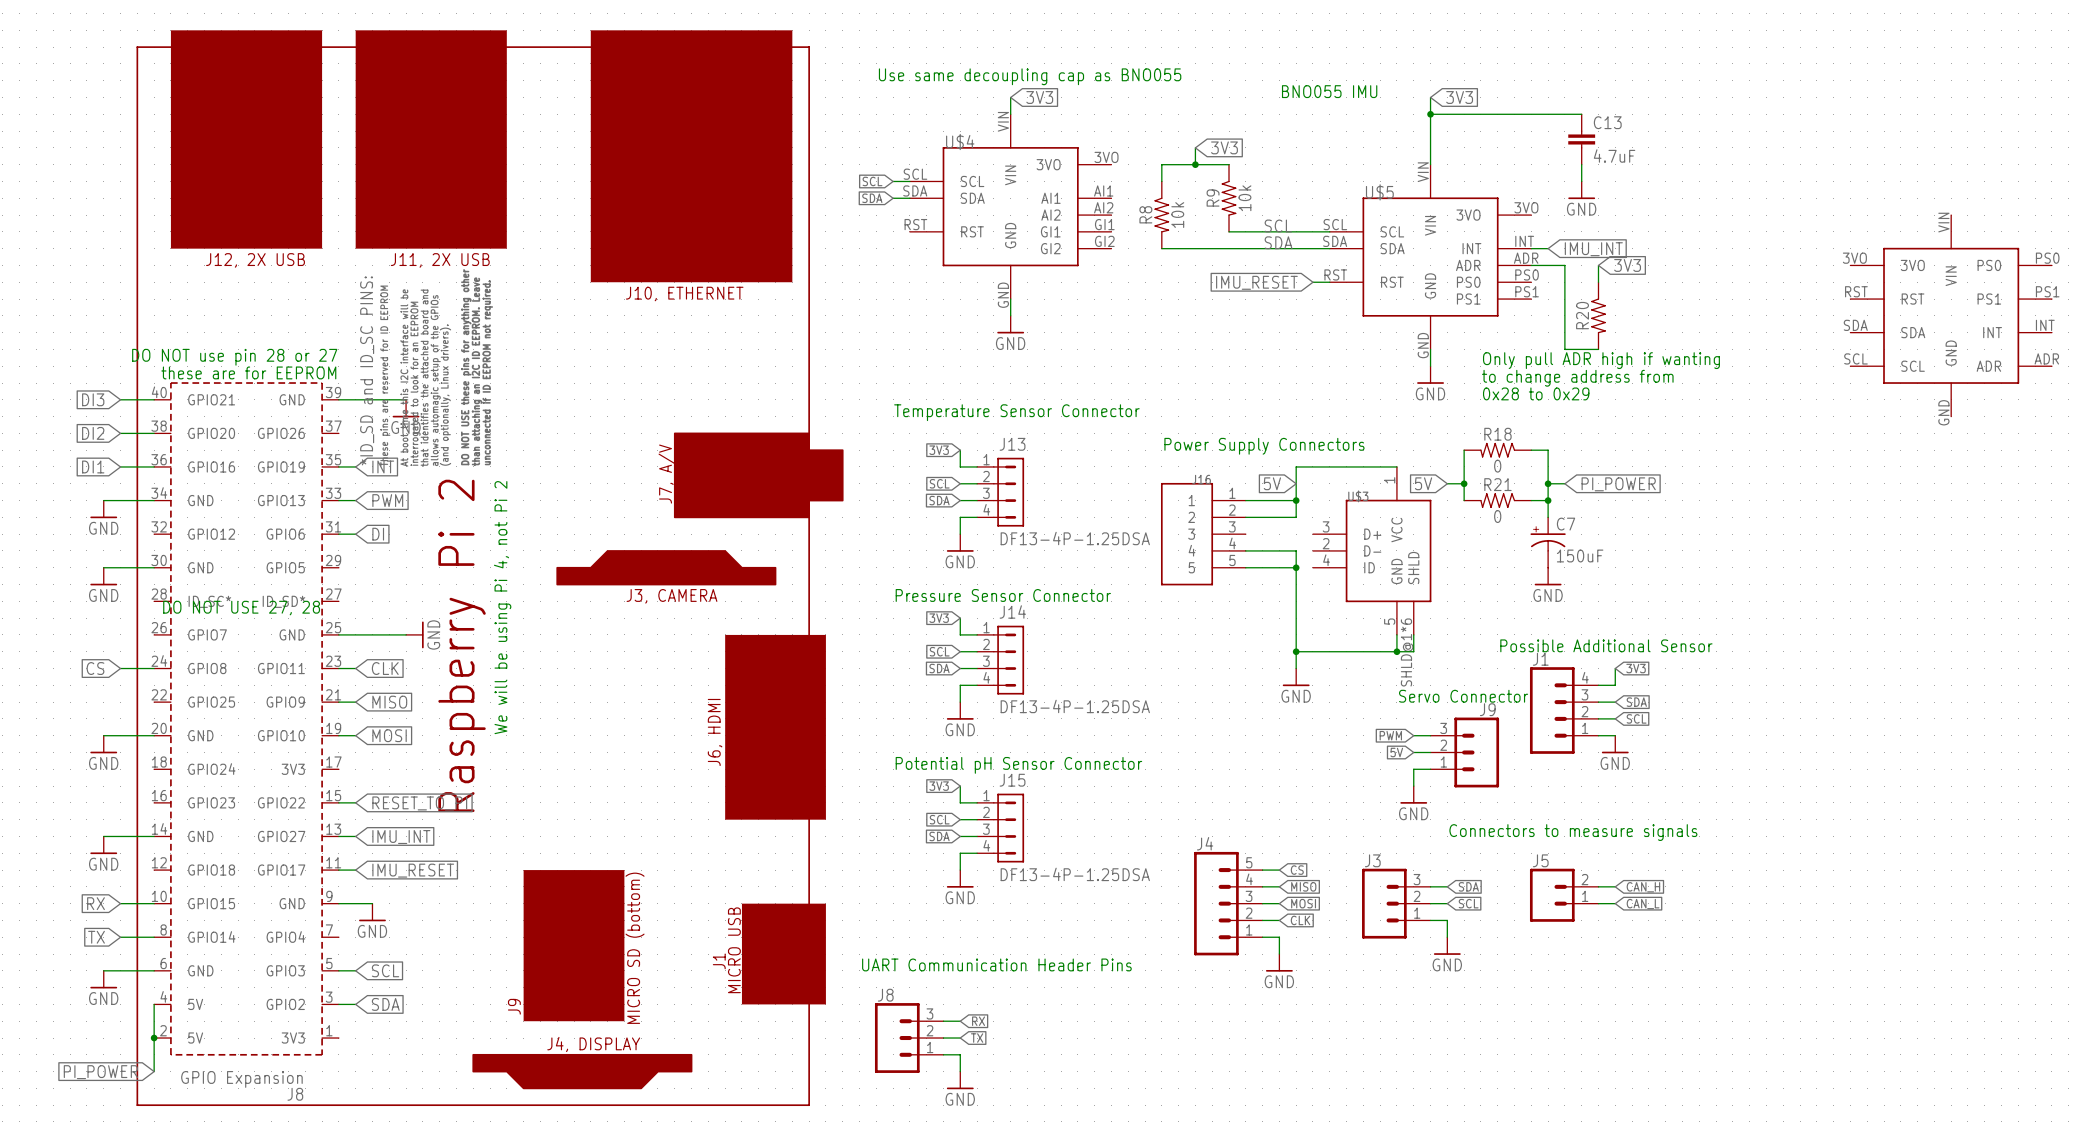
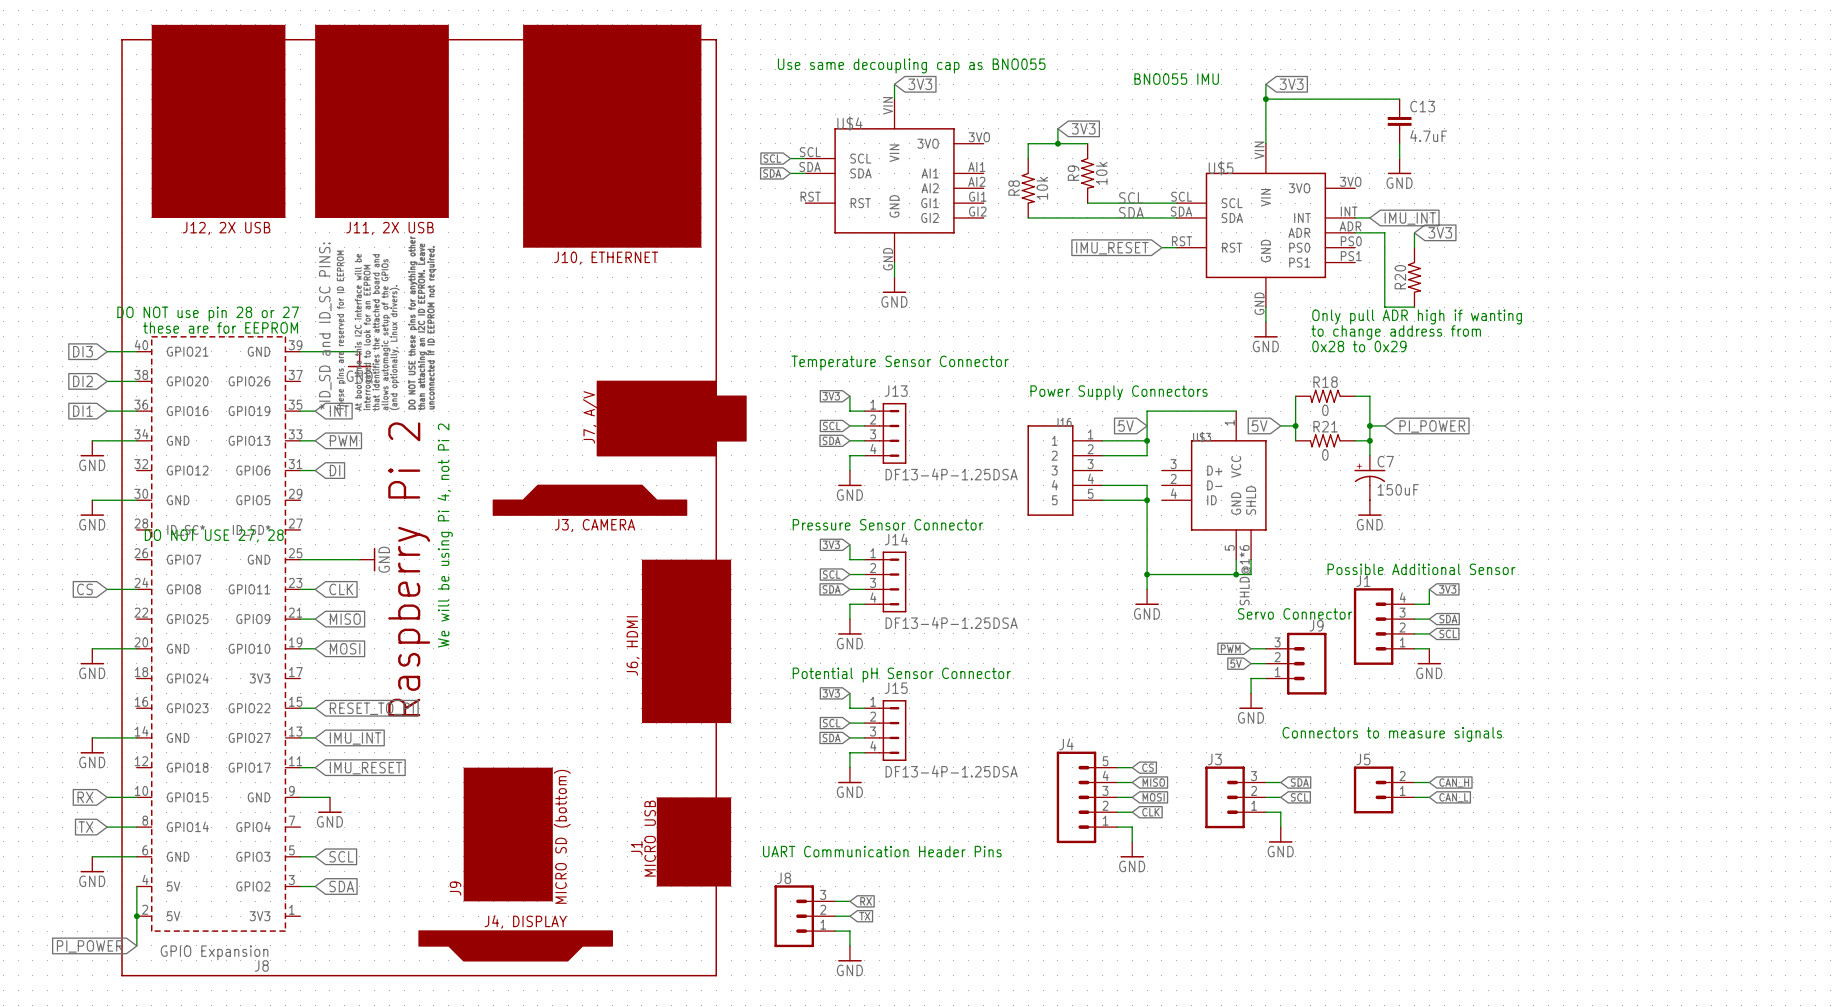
part: (1951, 315) -> none

